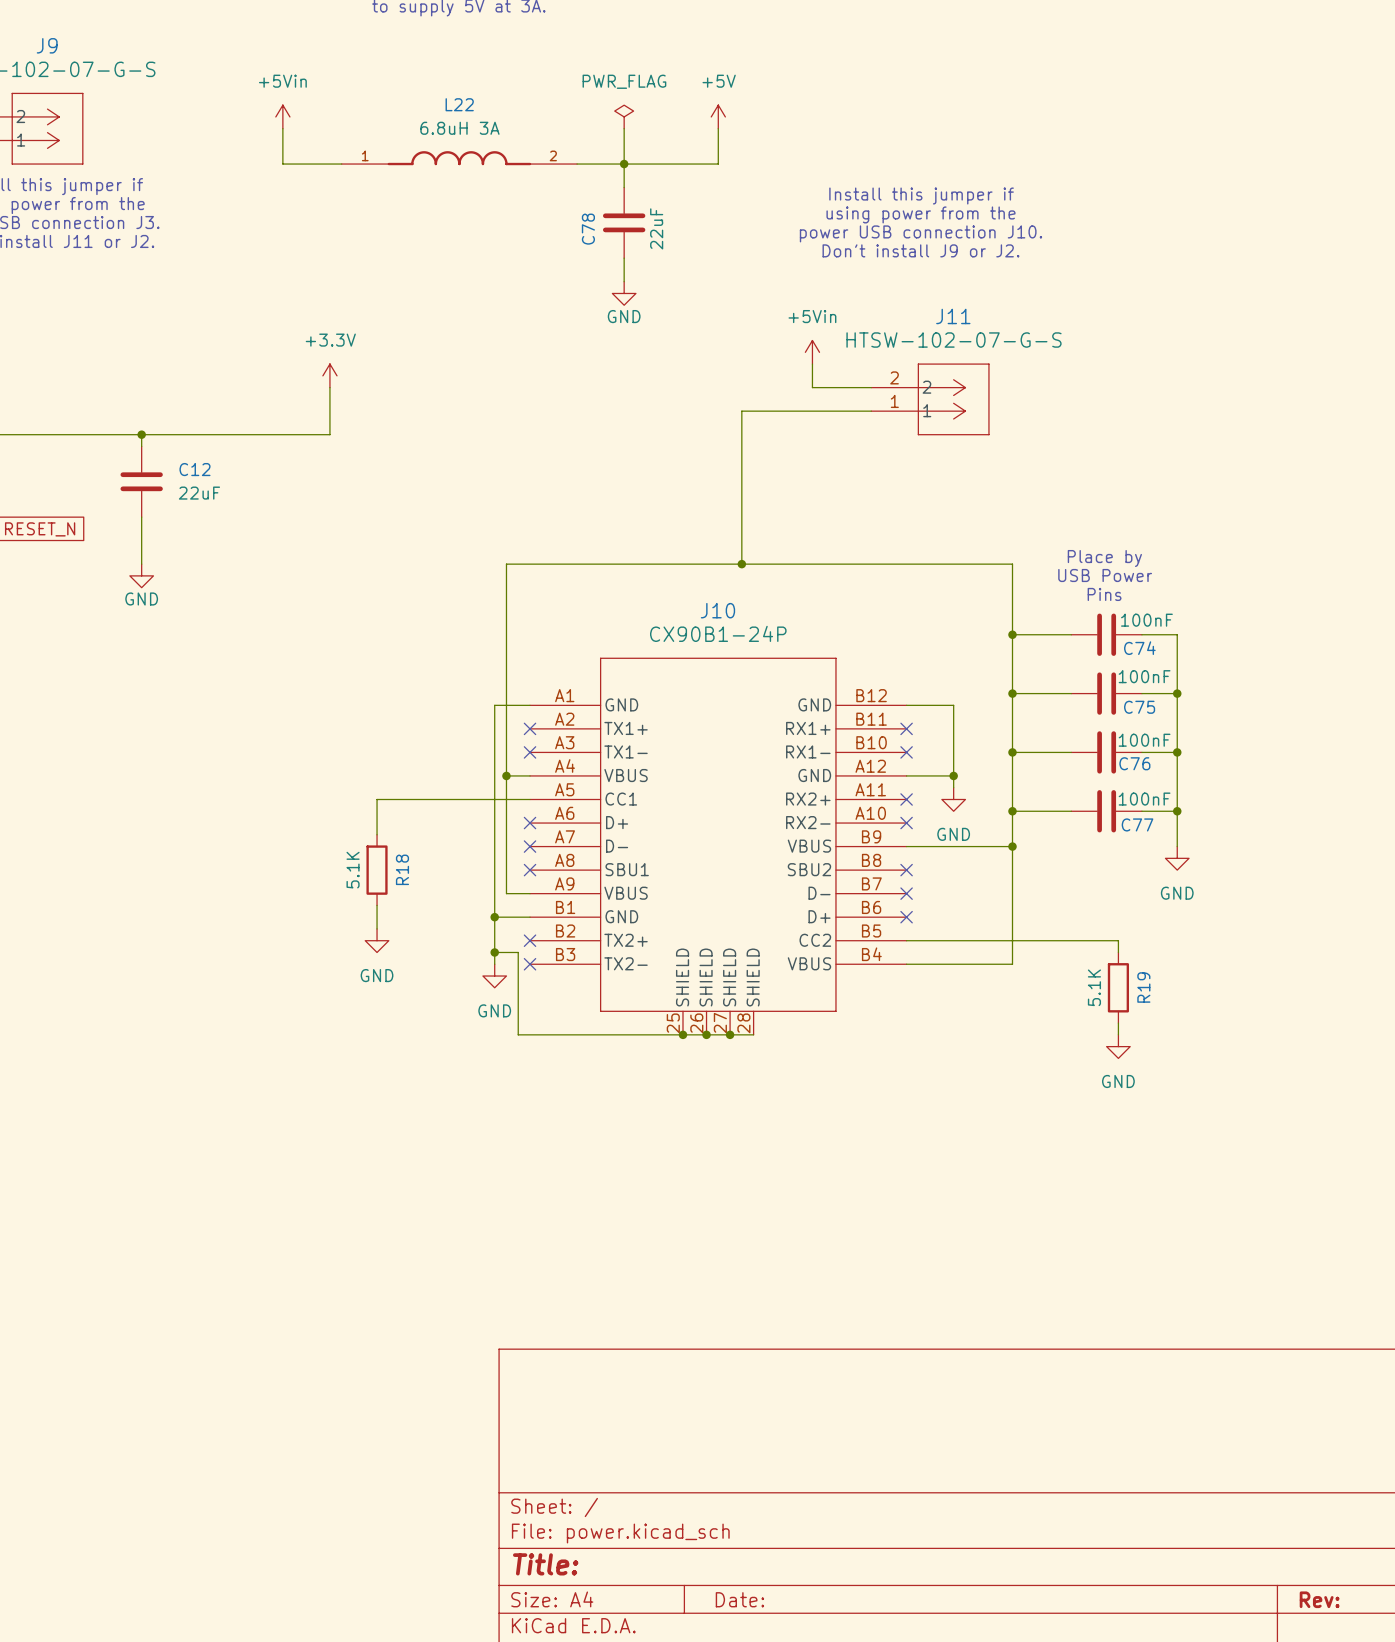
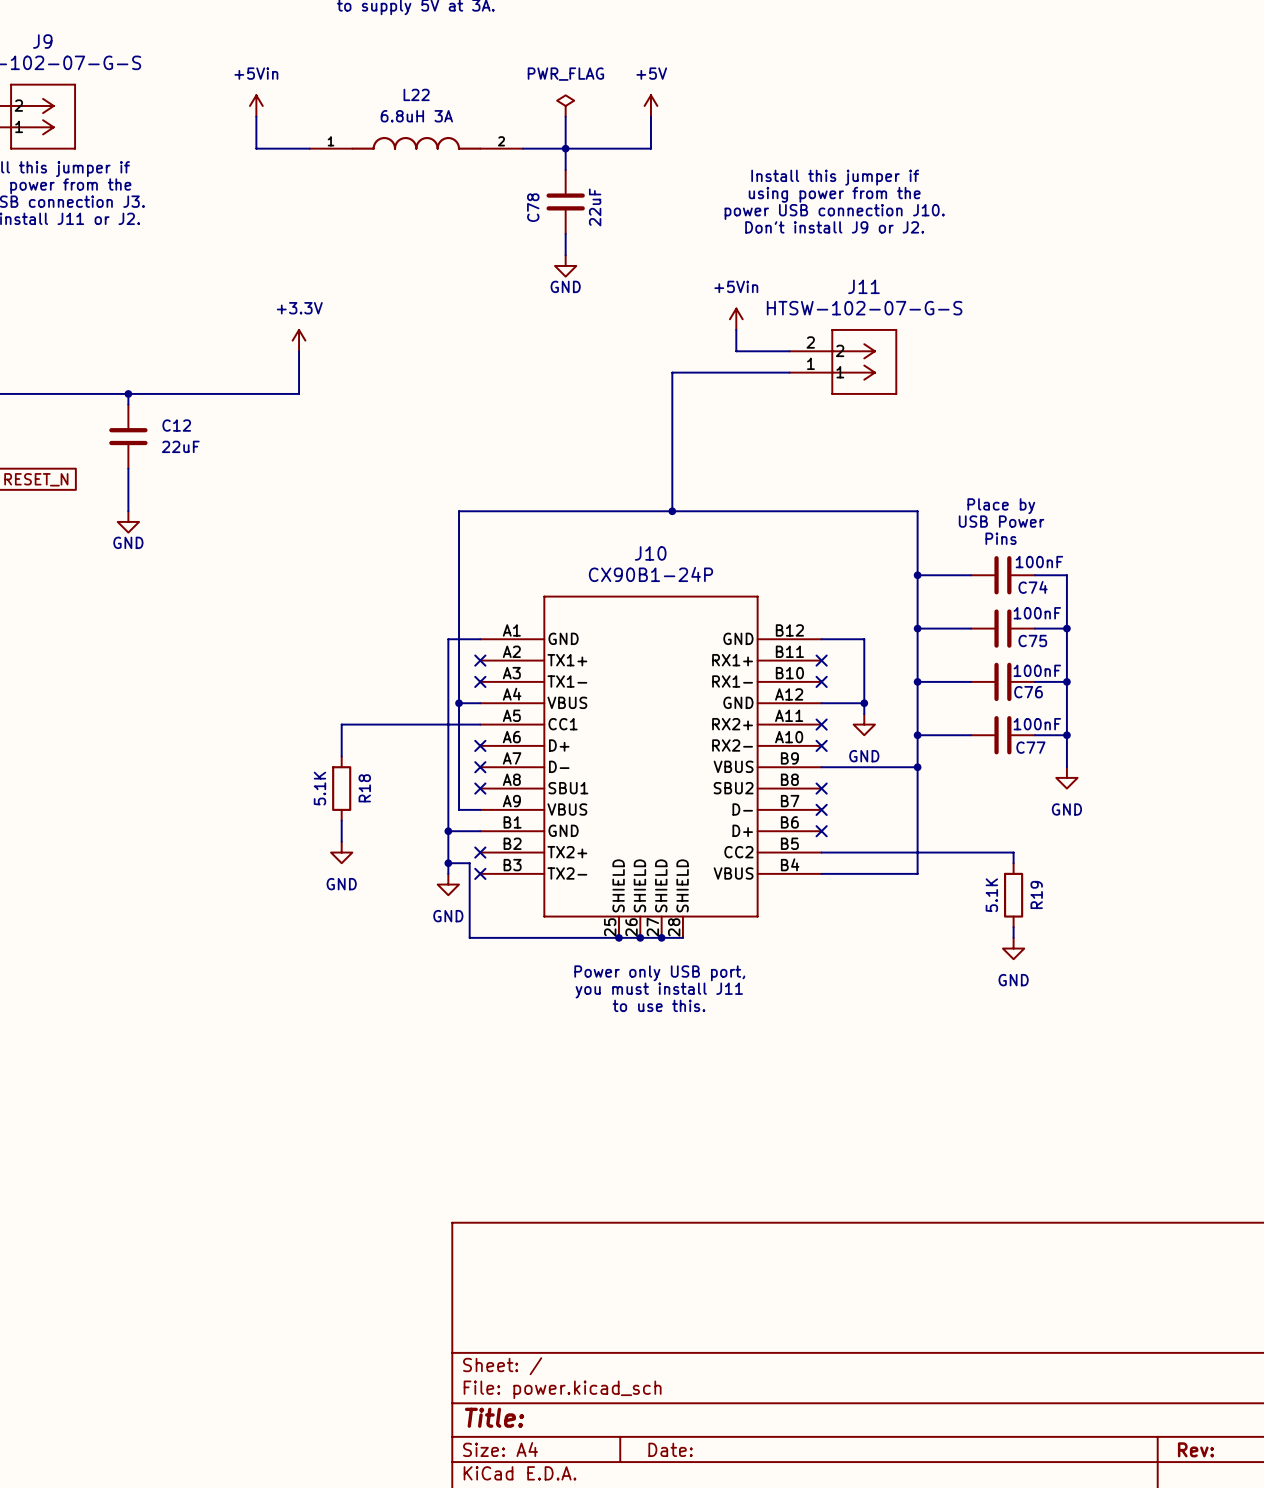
text: none -> Power only USB port, (659, 973)
text: none -> you must install J11 (659, 990)
text: none -> to use this. (659, 1005)

